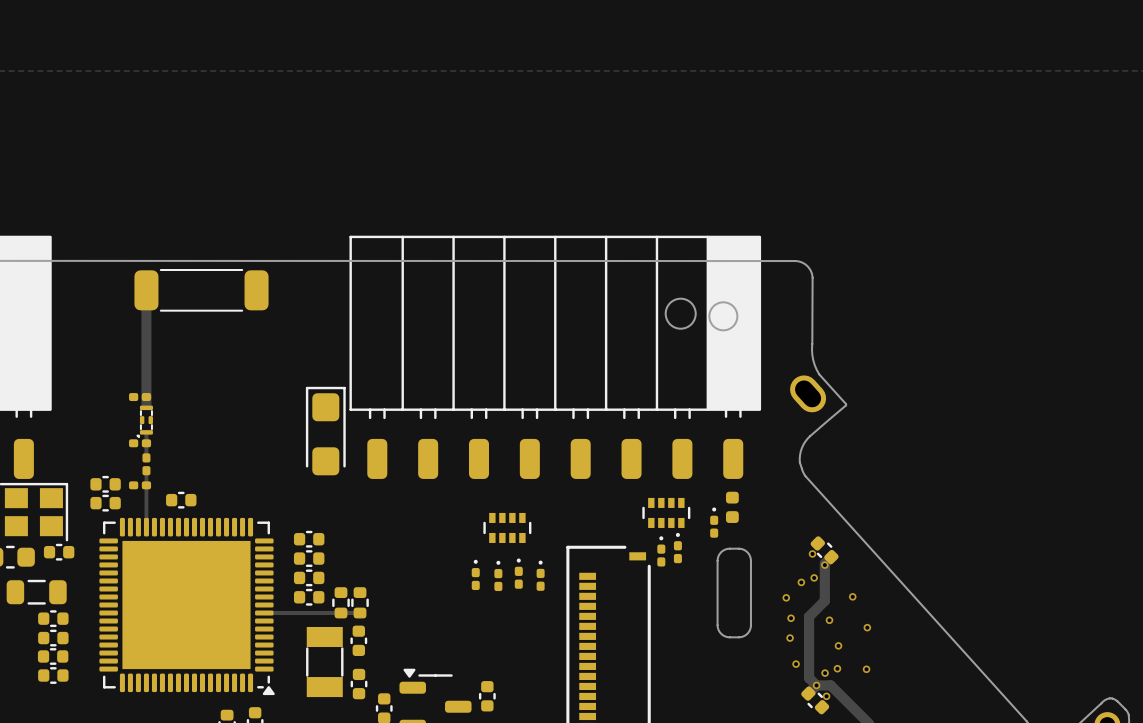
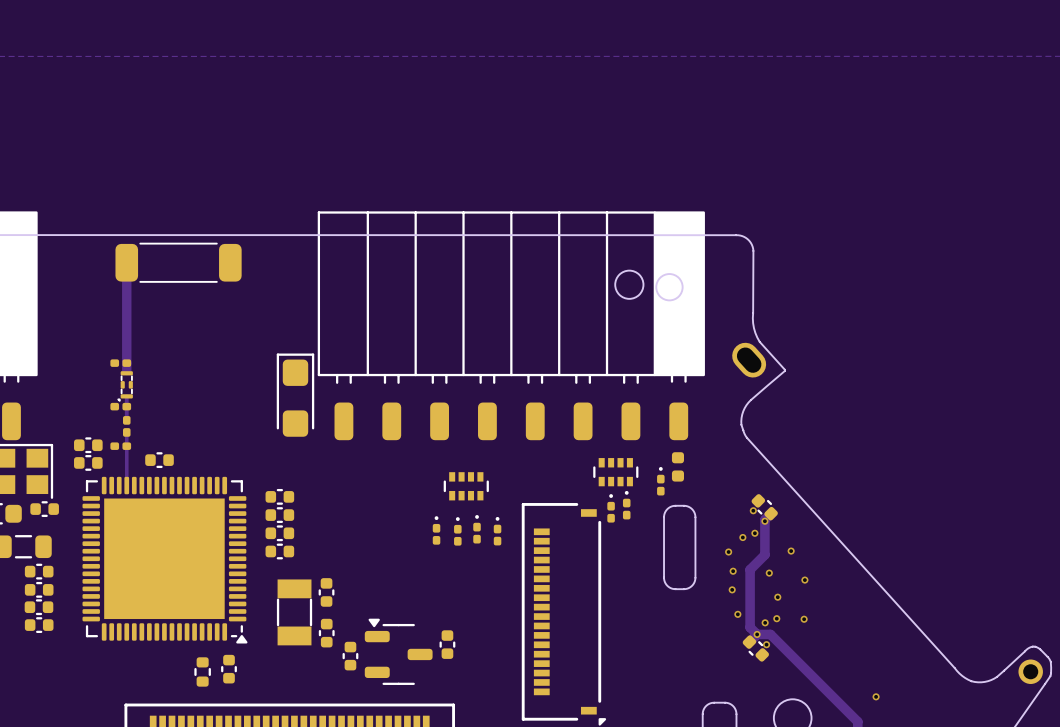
part: (341, 602) -> none
part: (360, 602) -> none
track: (360, 613) (264, 613) -> none

